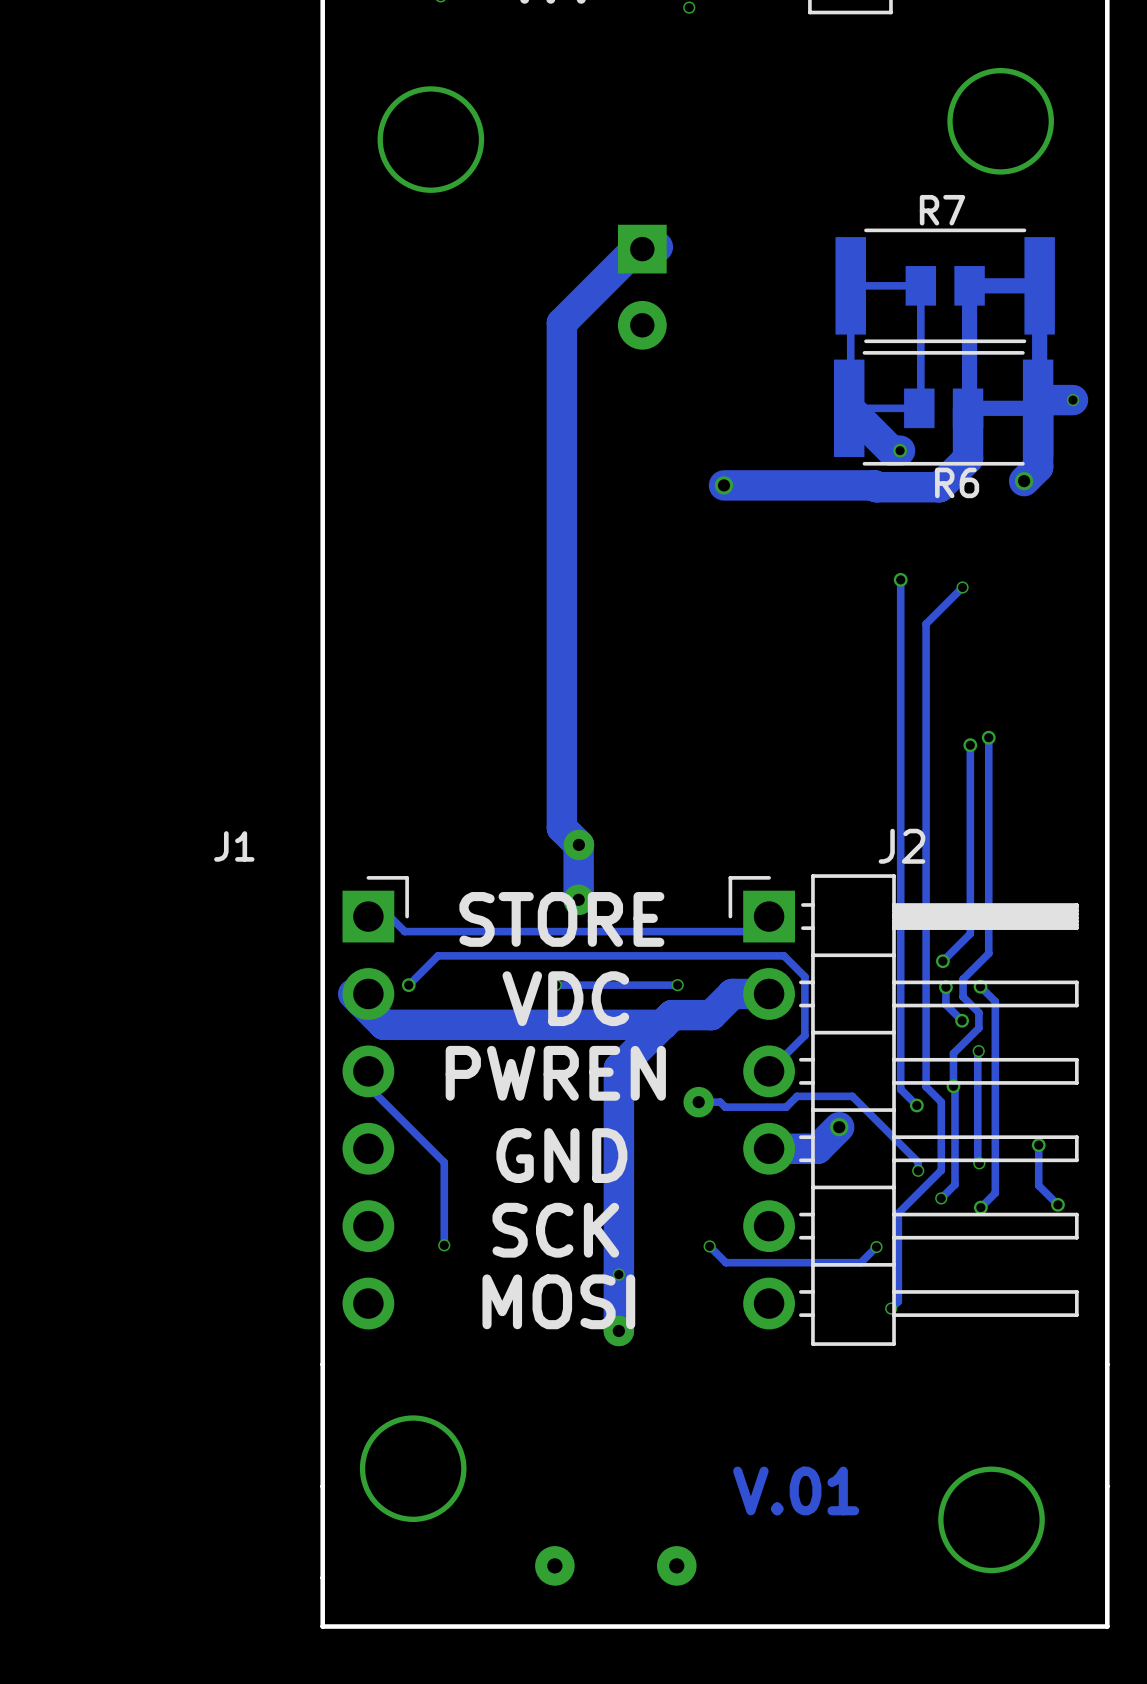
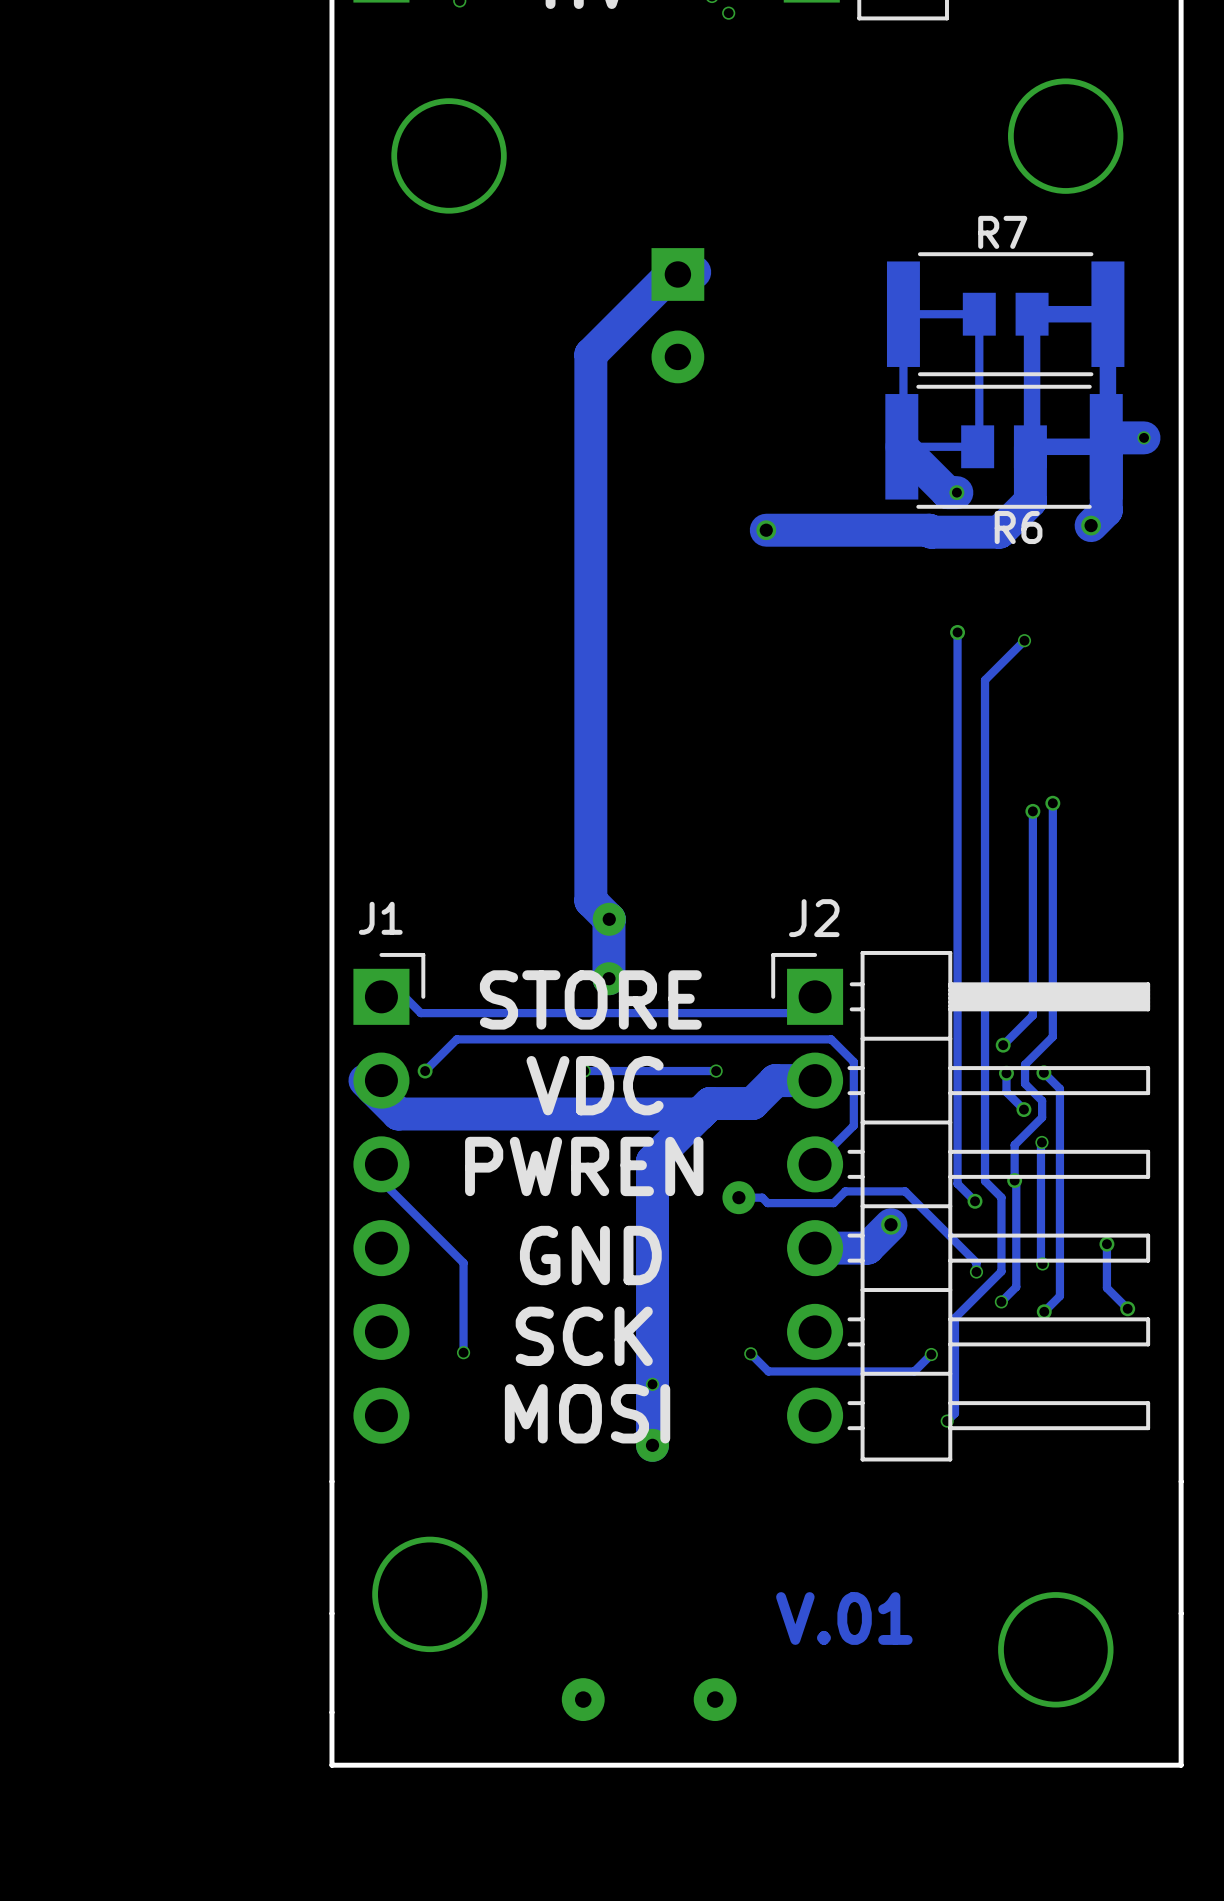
J1 name position: J1 (234, 846) -> J1 (380, 918)
J2 name position: J2 (901, 846) -> J2 (814, 918)

